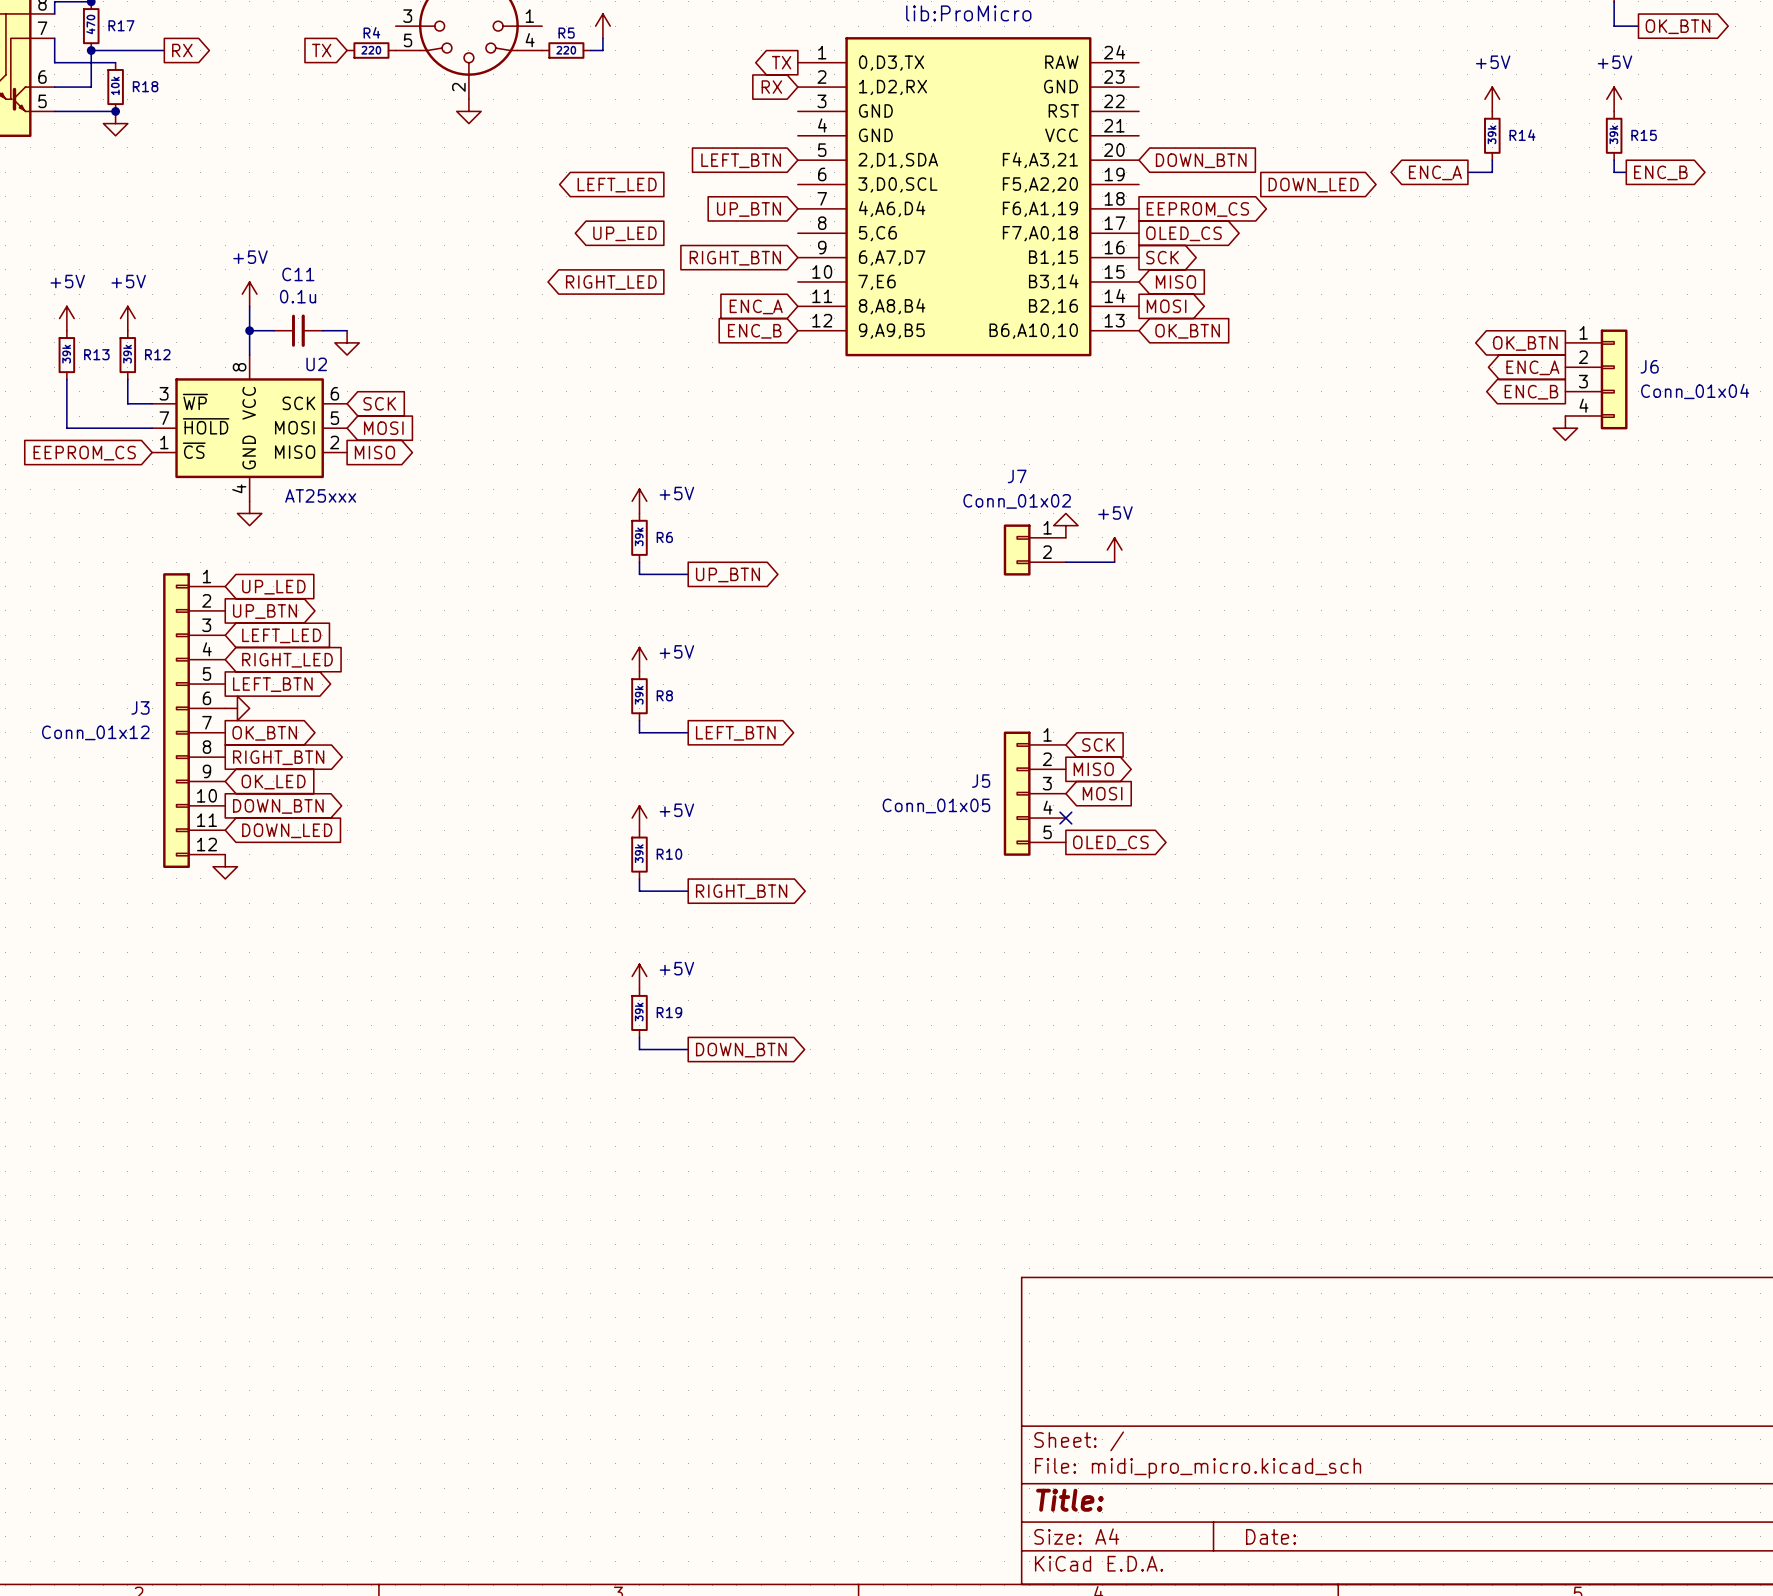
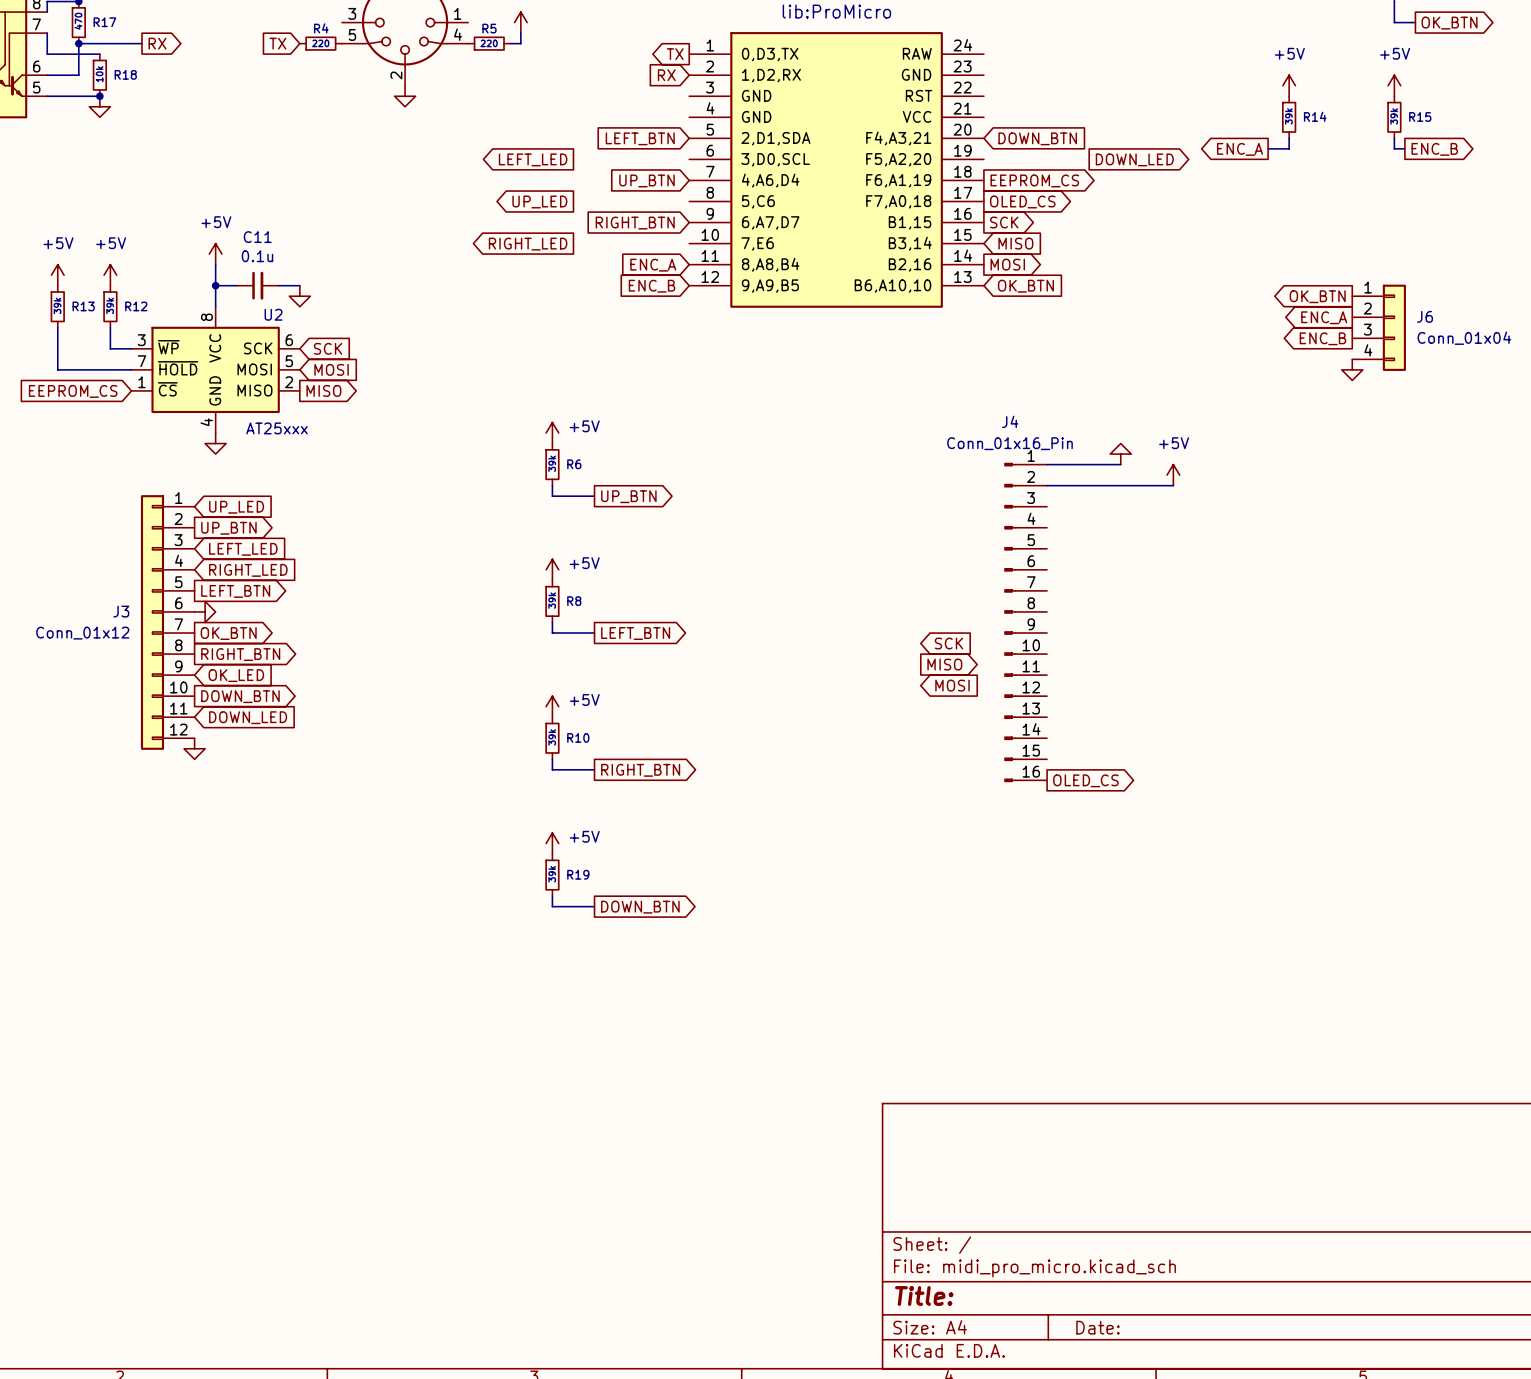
power symbol position: (1065, 525) -> (1120, 454)
wire: none -> (1047, 464) (1120, 464)
J7: Conn_01x02 (1034, 550) -> none
power symbol: +5V (1114, 550) -> none
power symbol: none -> +5V (1173, 475)
wire: (1065, 562) (1114, 562) -> none
wire: none -> (1047, 485) (1173, 485)
J4: none -> Conn_01x16_Pin (1025, 622)
J5: Conn_01x05 (1034, 793) -> none
no-connect mark: (1065, 818) -> none
global label position: OLED_CS (1110, 842) -> OLED_CS (1085, 780)

